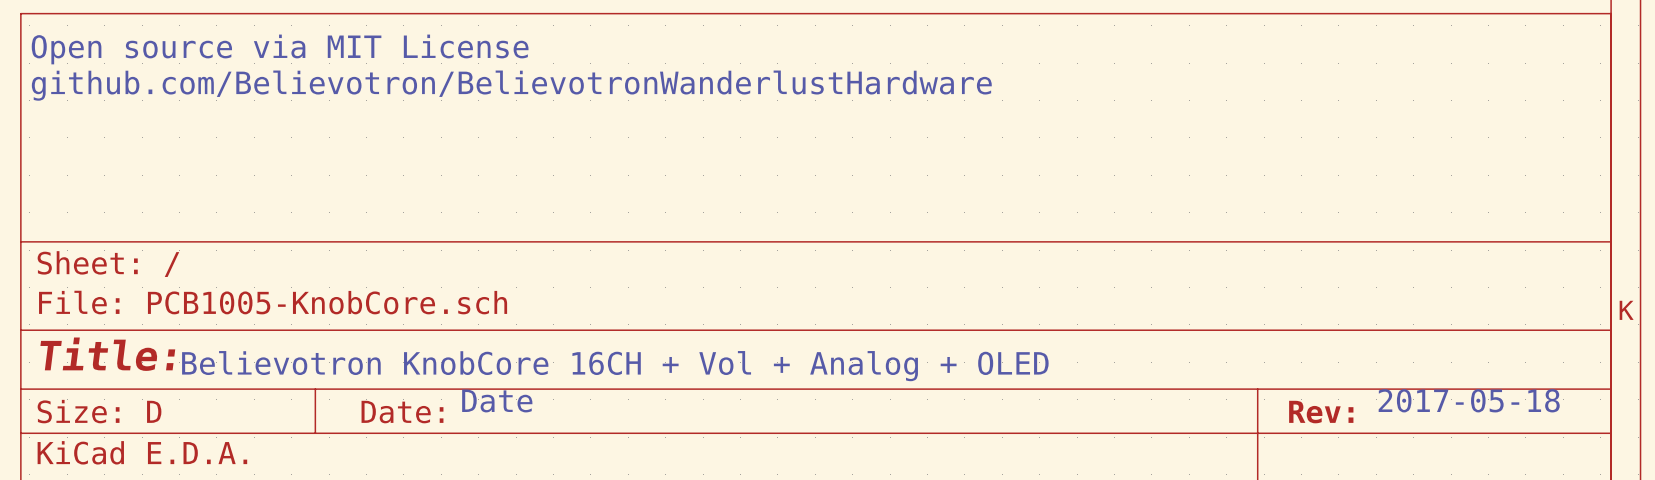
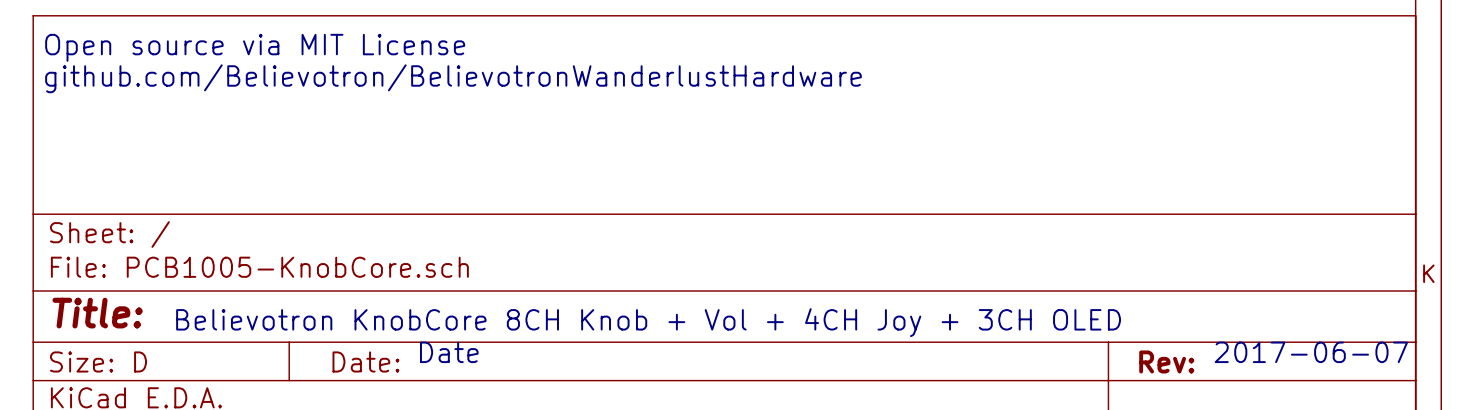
text: Believotron KnobCore 16CH + Vol + Analog + OLED (615, 366) -> Believotron KnobCore 8CH Knob + Vol + 4CH Joy + 3CH OLED (648, 322)
text: 2017-05-18 (1469, 400) -> 2017-06-07 (1311, 352)

